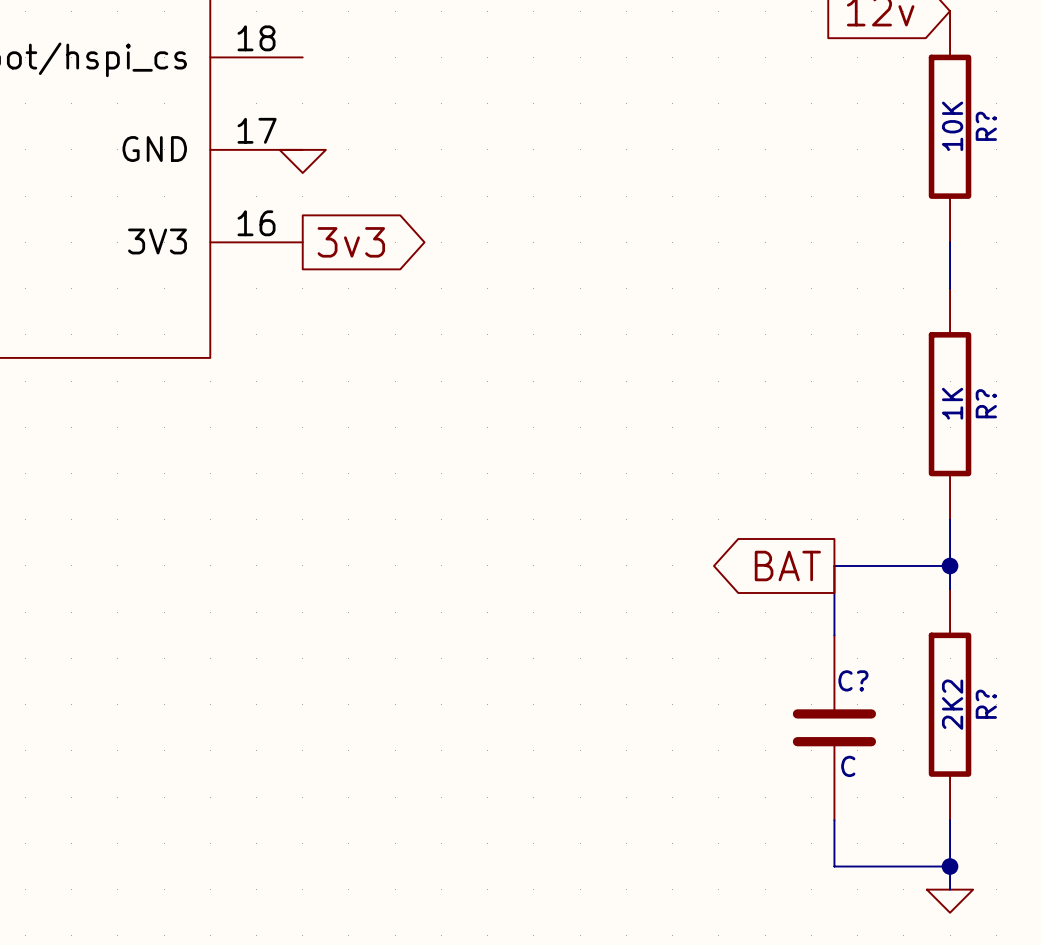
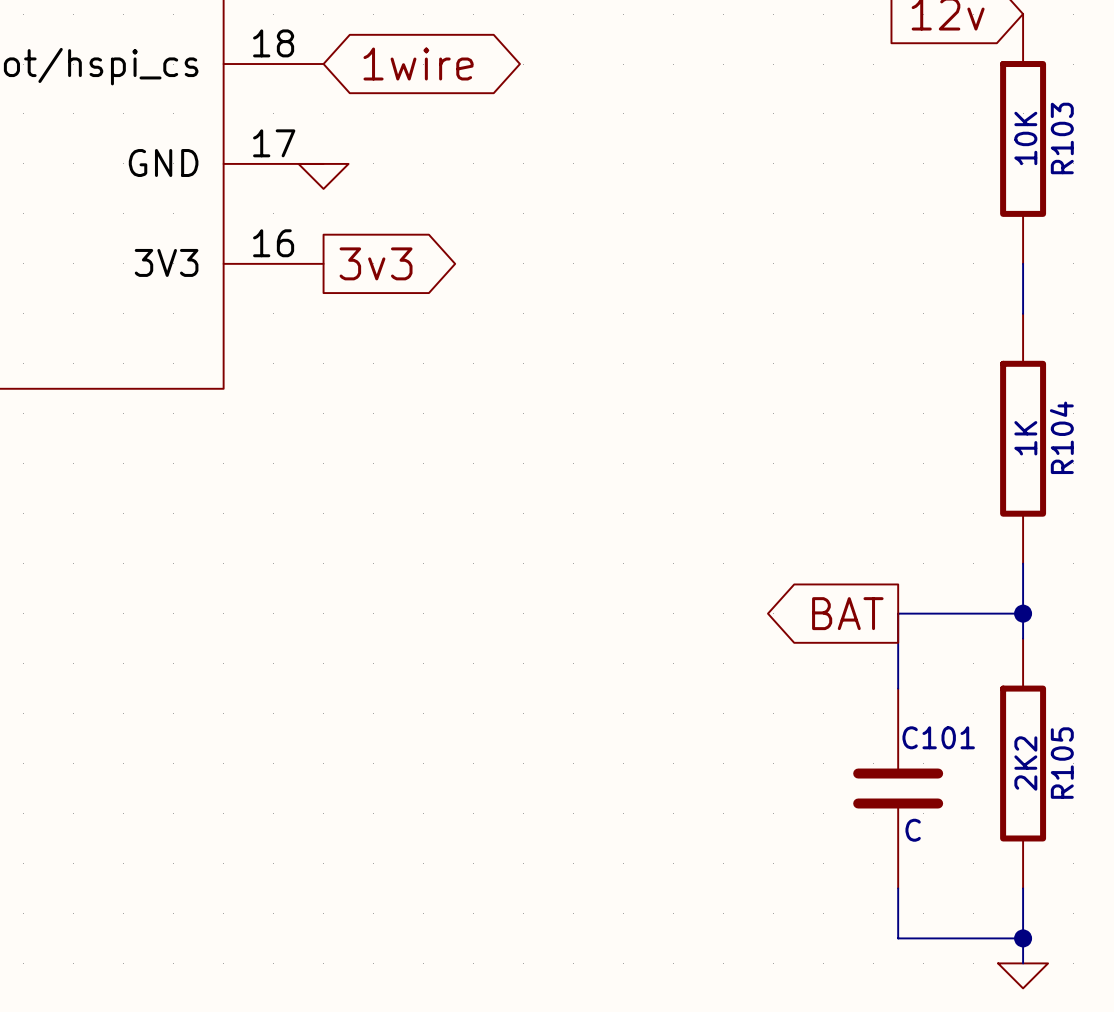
global label: none -> 1wire (418, 64)
R? name: R? (986, 126) -> R103 (1062, 138)
R? name: R? (986, 403) -> R104 (1061, 437)
C? name: C? (853, 680) -> C101 (938, 737)
R? name: R? (986, 704) -> R105 (1062, 763)

